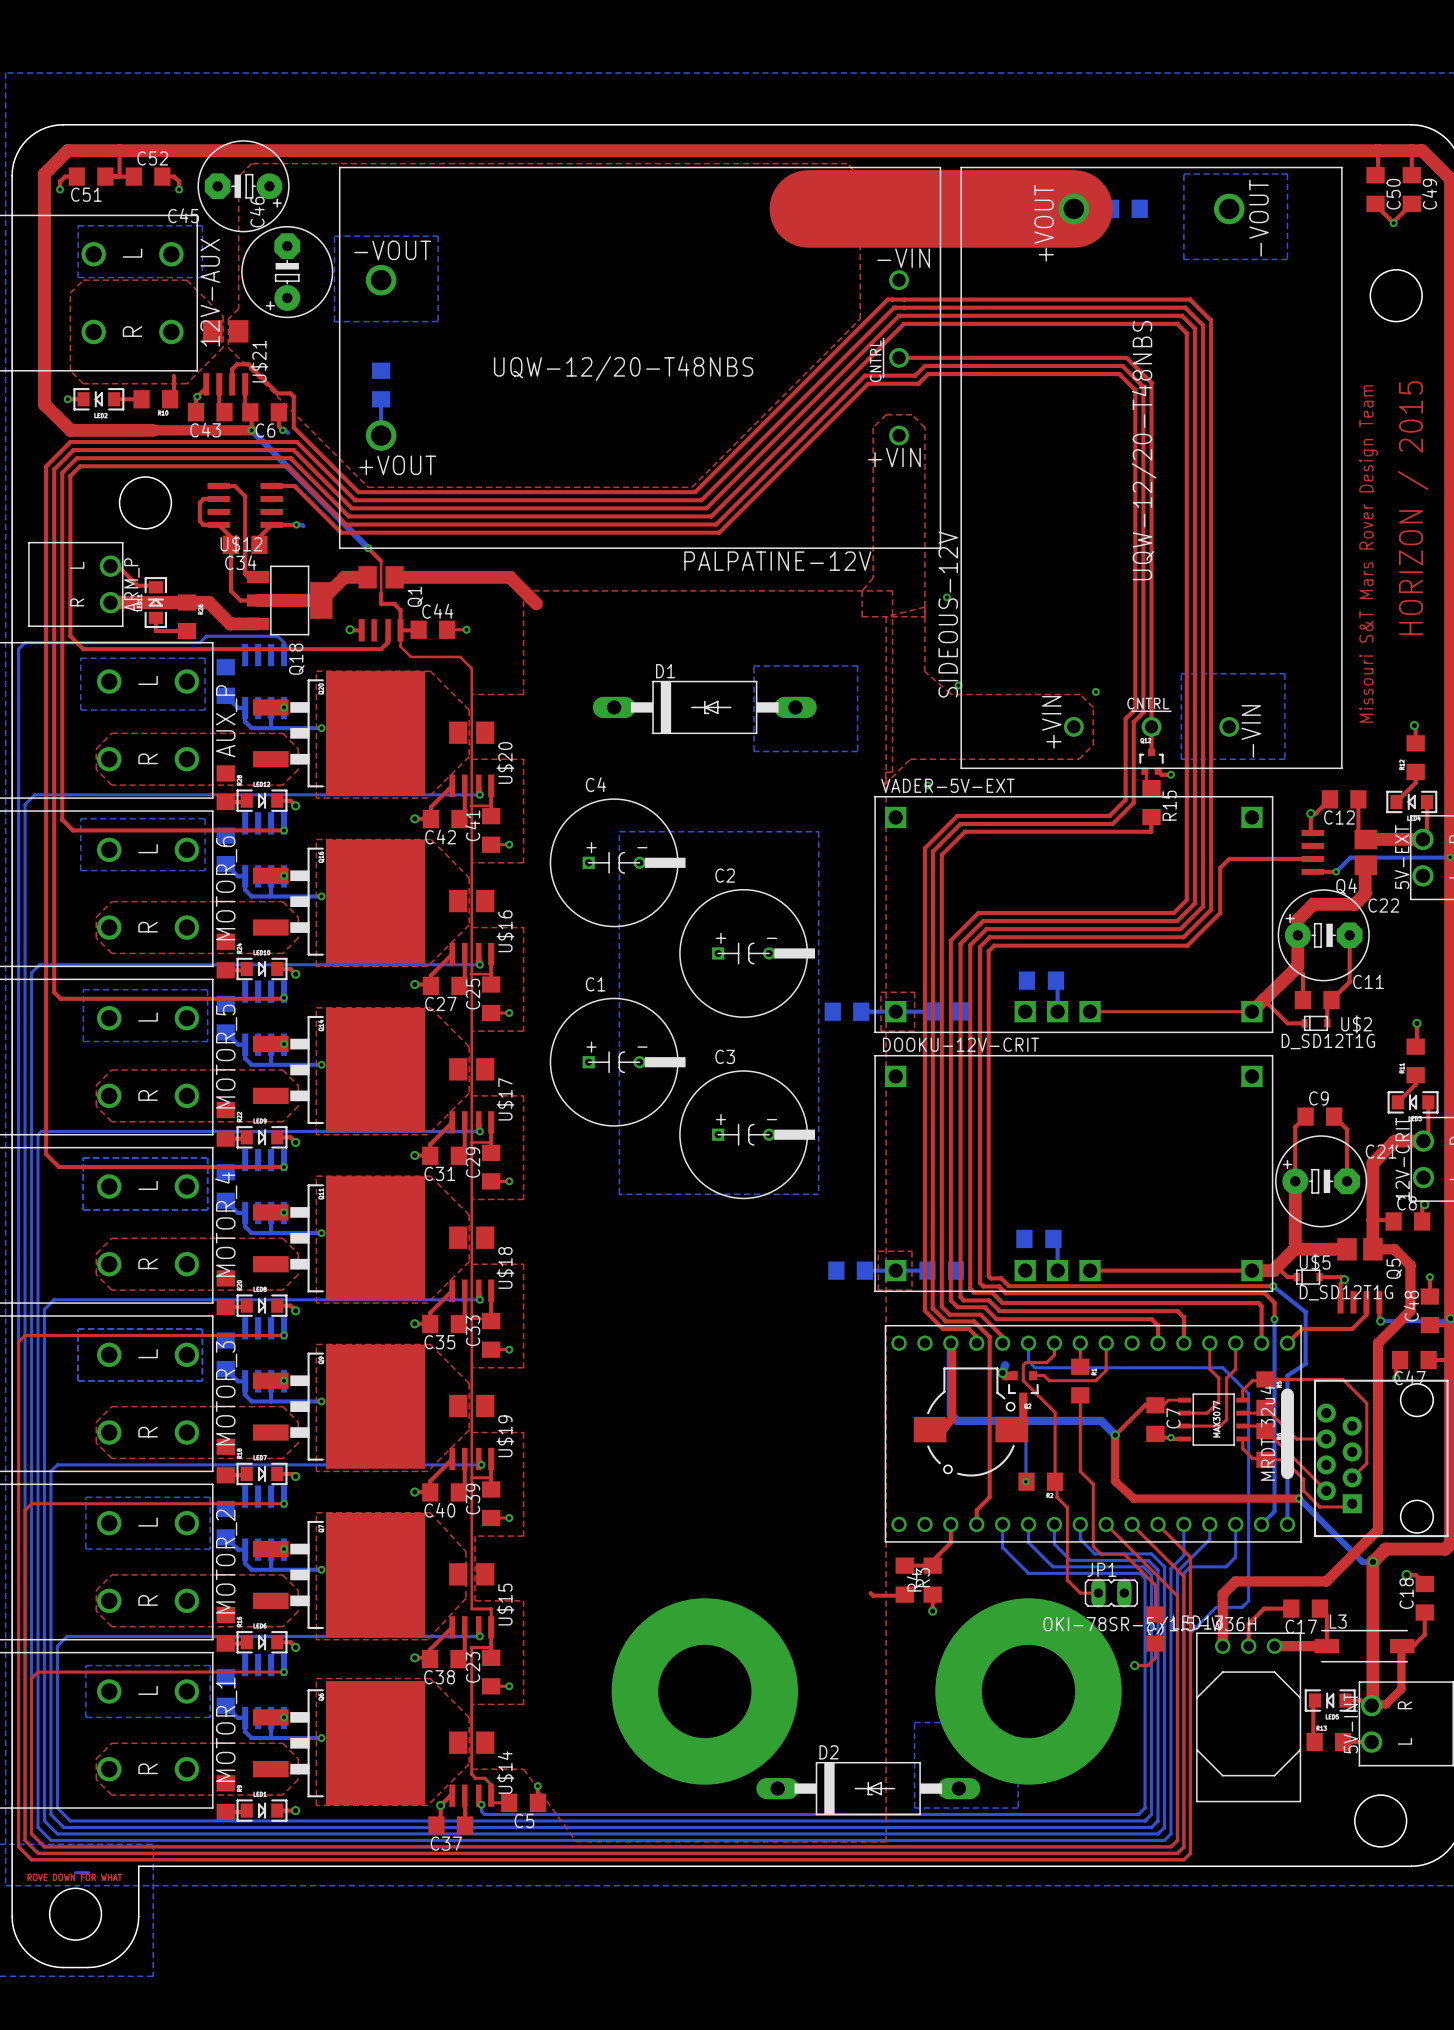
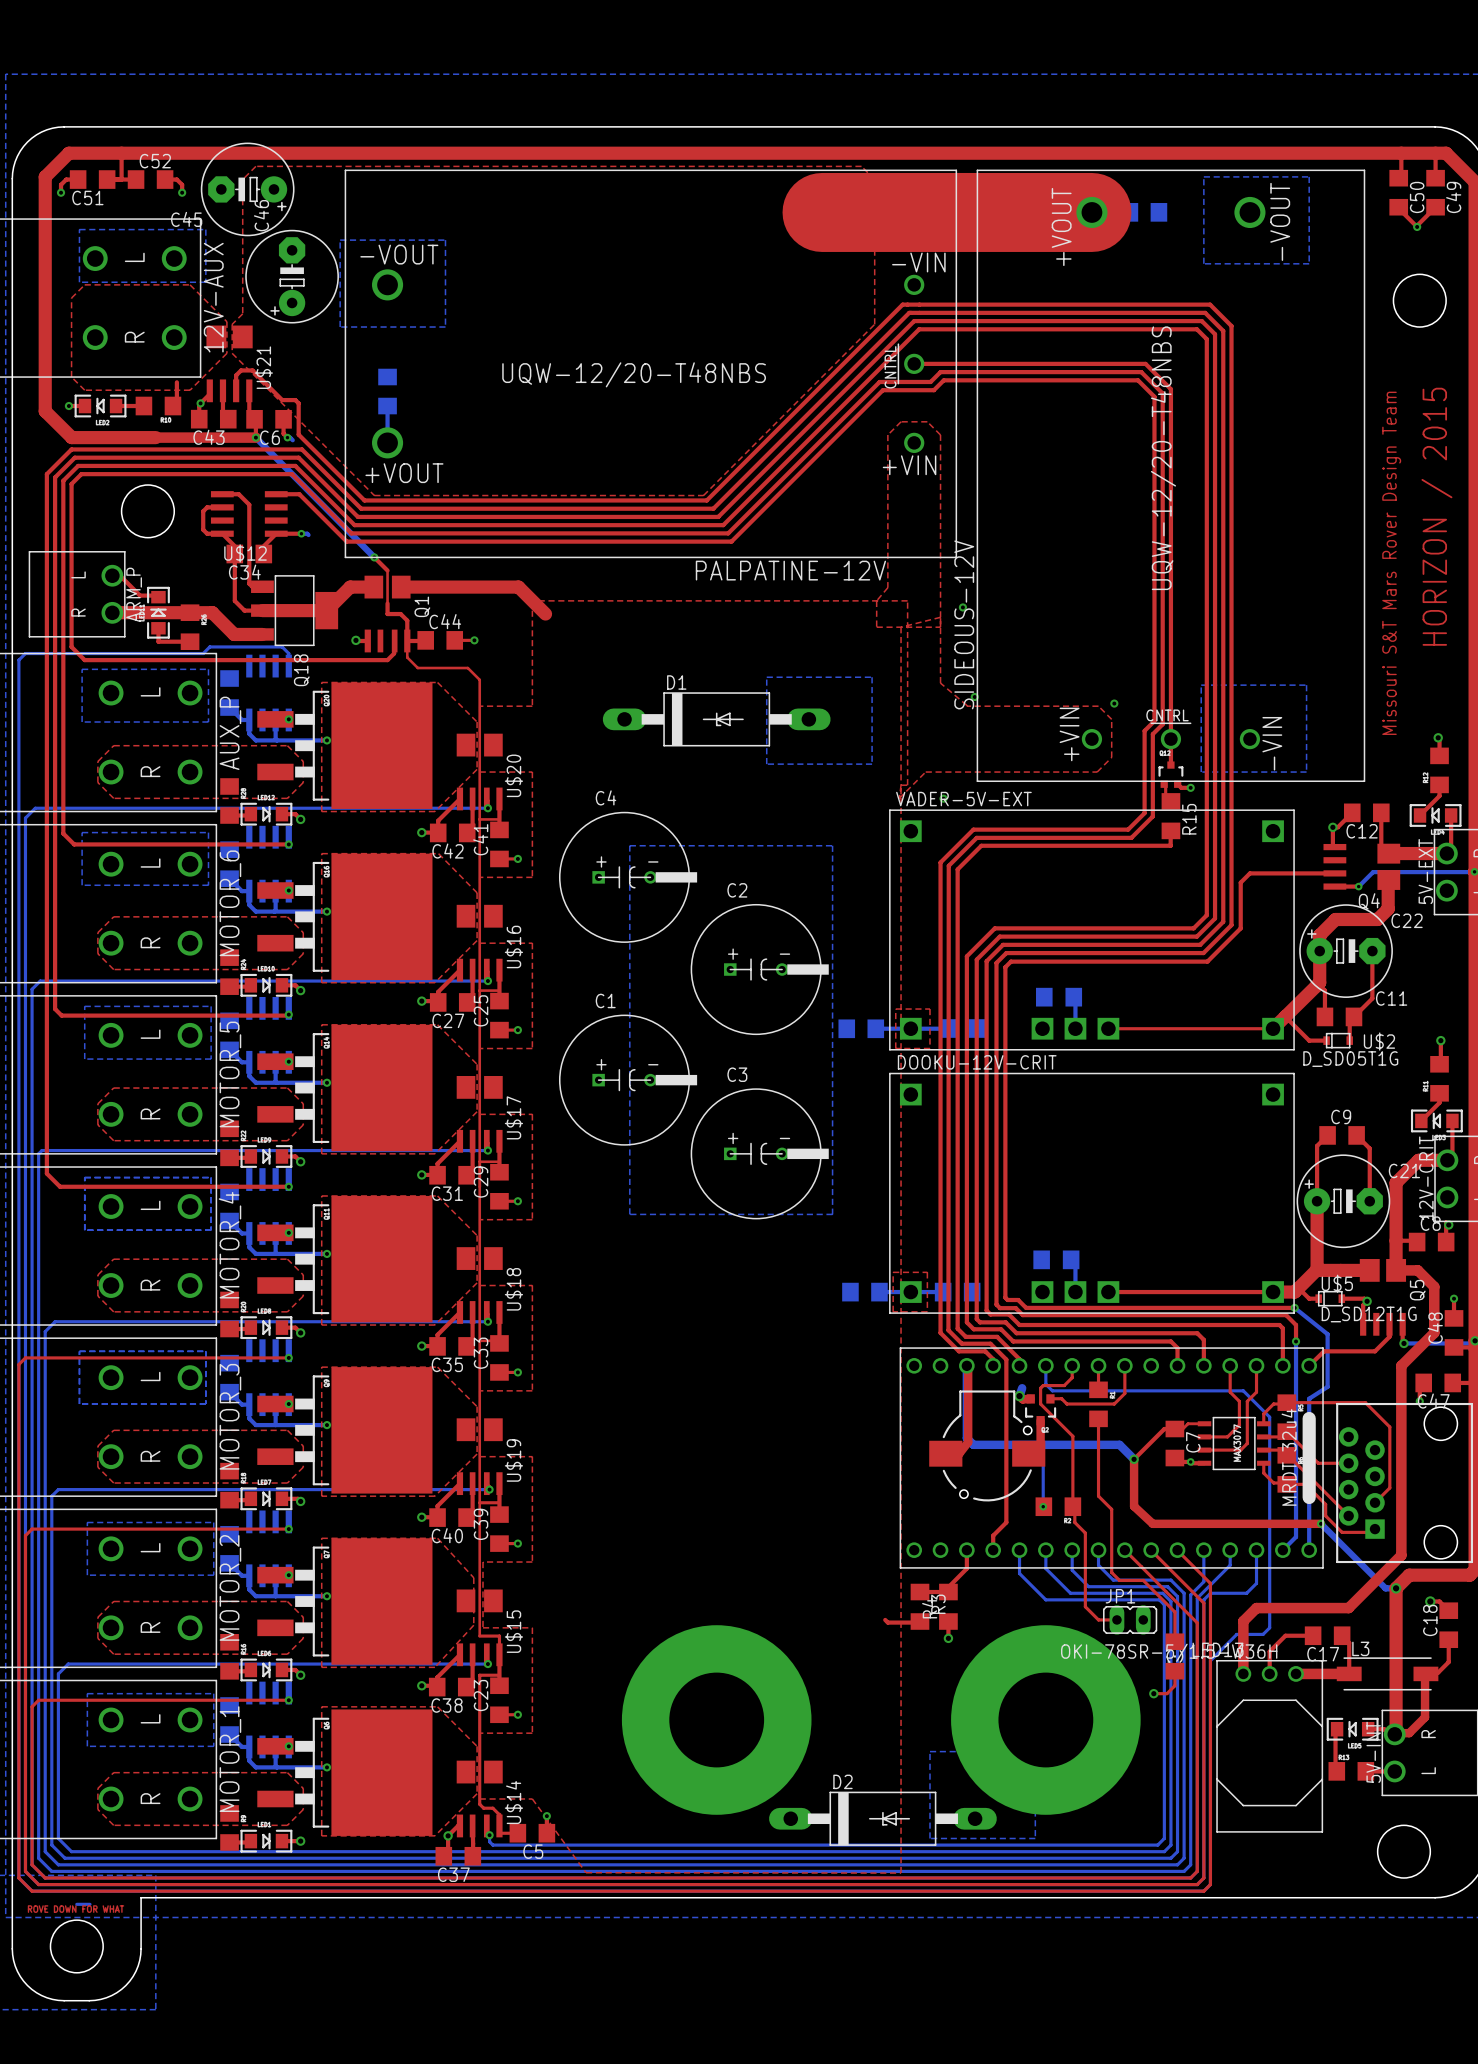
U$2 value: D_SD12T1G (1328, 1041) -> D_SD05T1G (1350, 1059)

